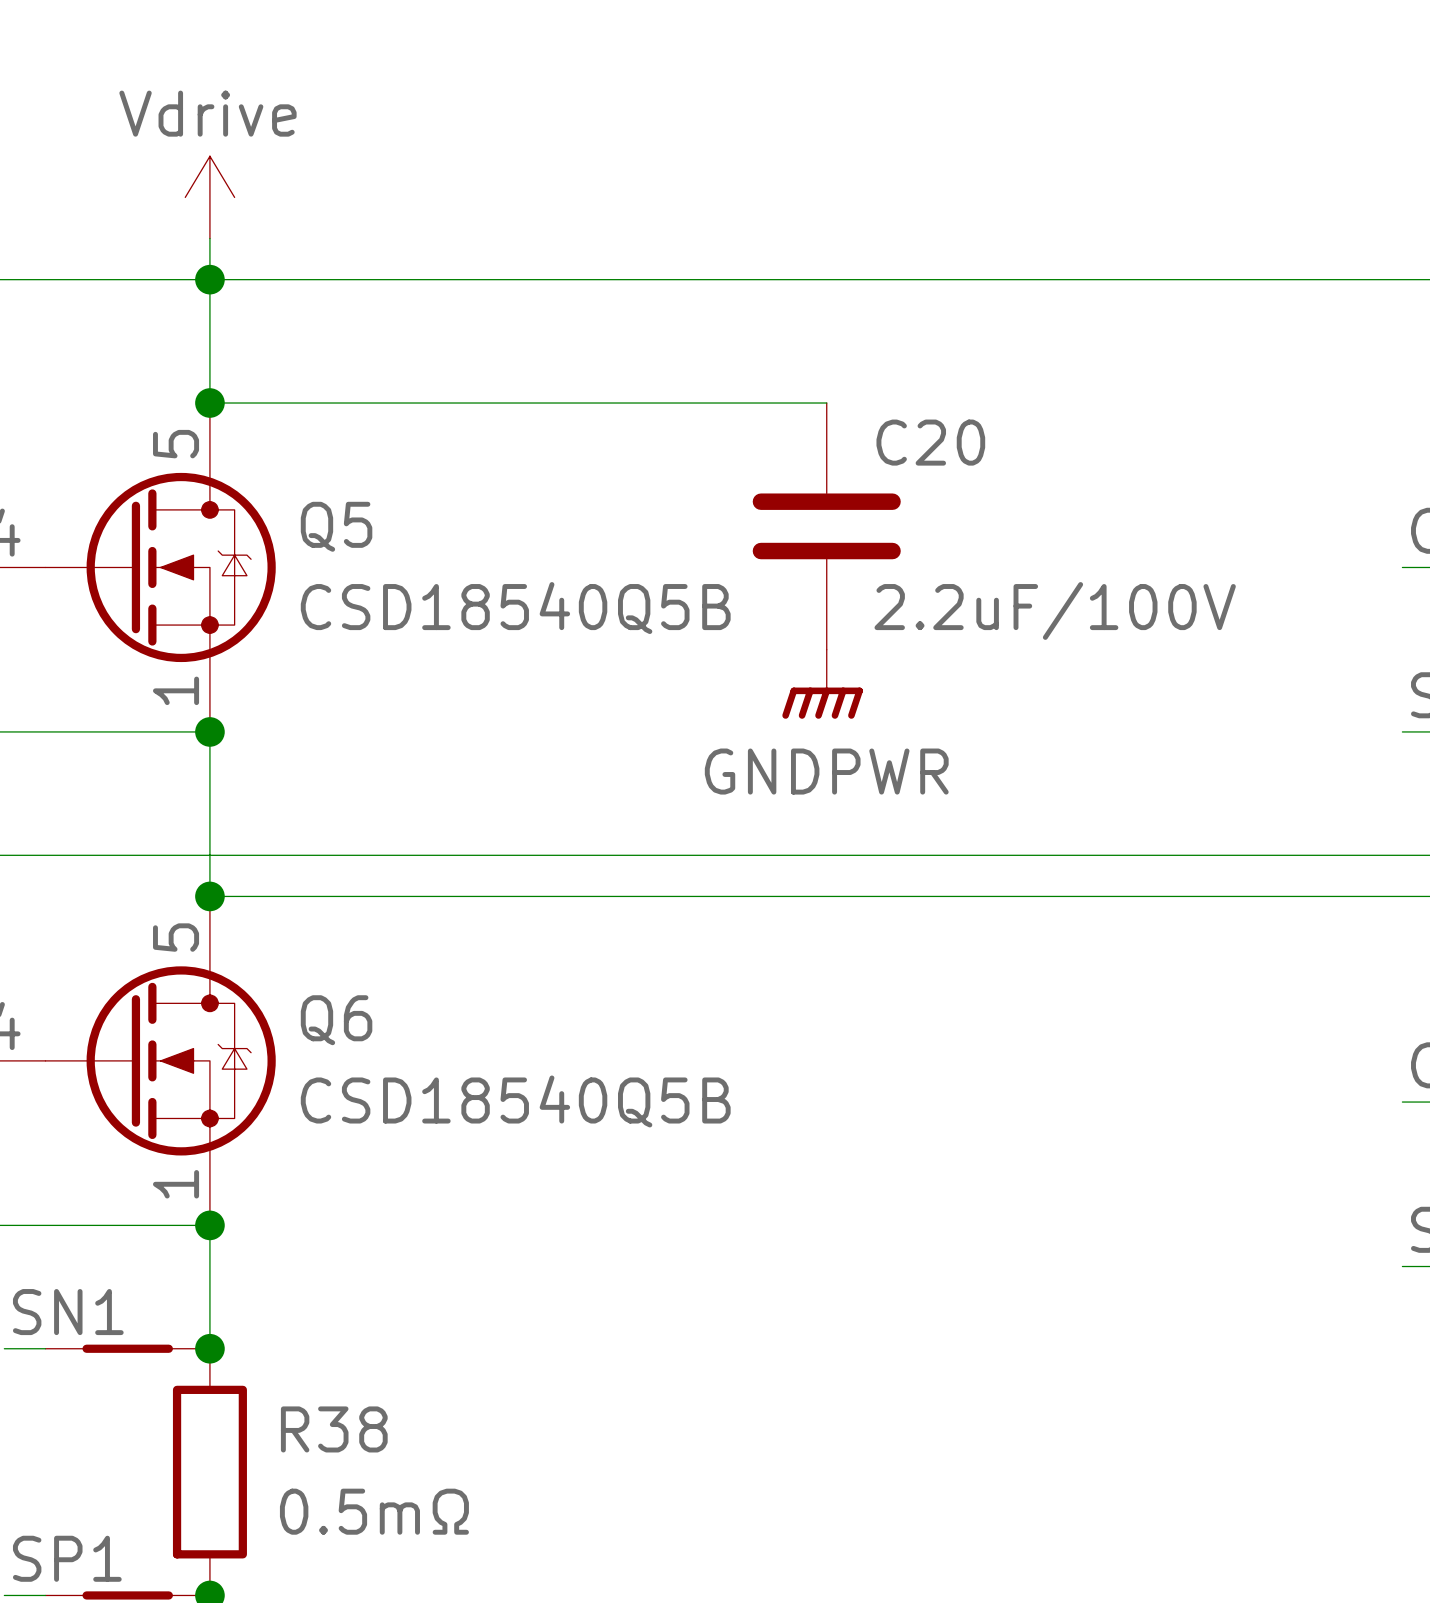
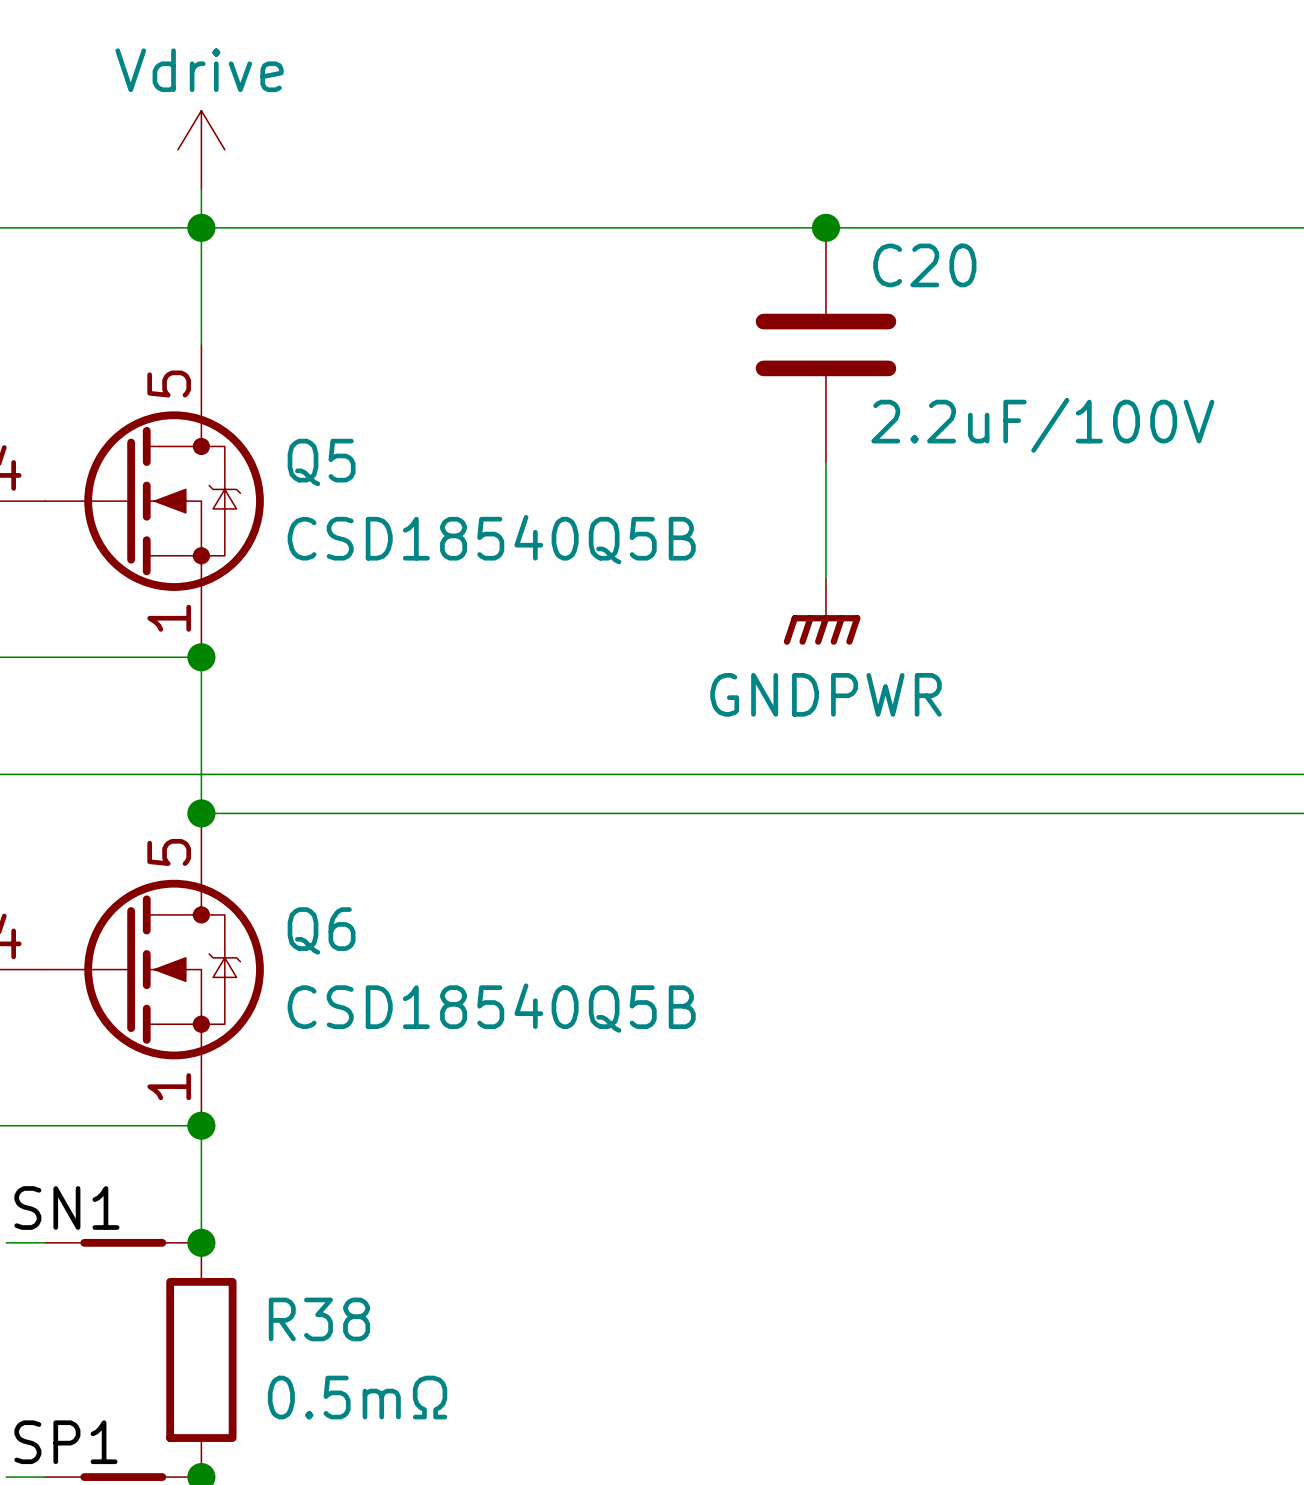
junction: none -> (826, 227)
wire: (209, 403) (826, 403) -> none
junction: (209, 403) -> none
C20 position: (826, 526) -> (826, 344)
wire: none -> (826, 462) (826, 579)
power symbol position: GNDPWR (822, 684) -> GNDPWR (822, 611)

